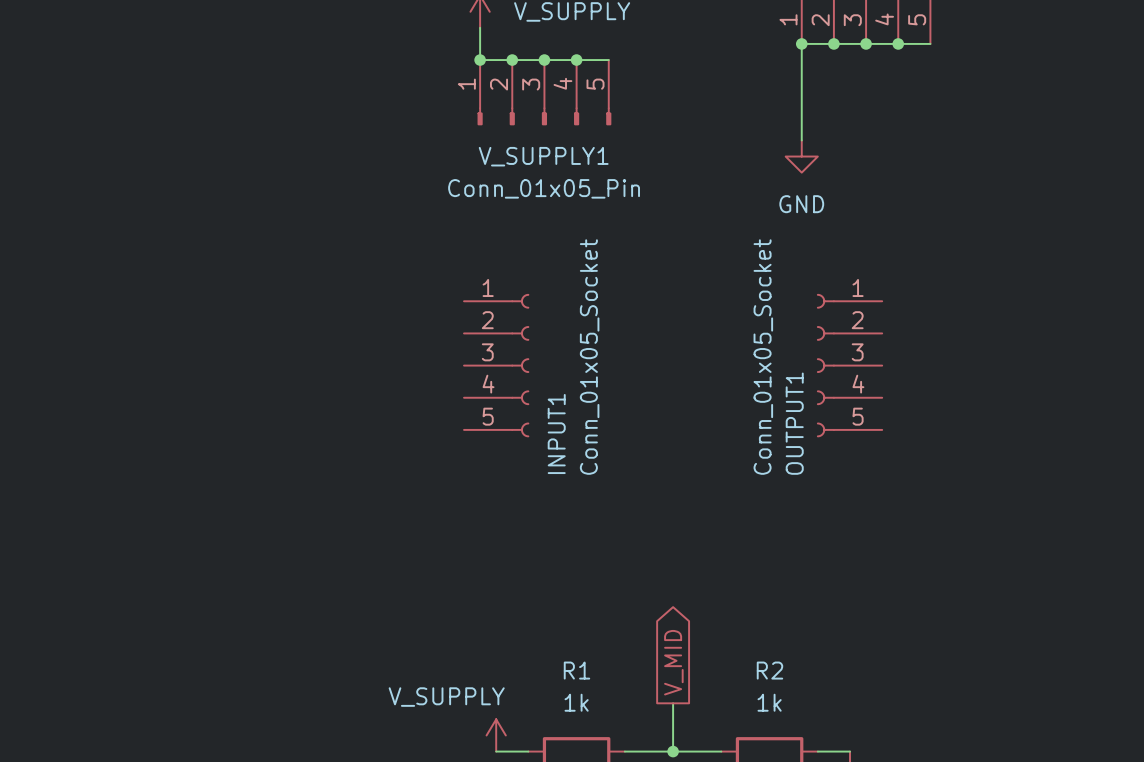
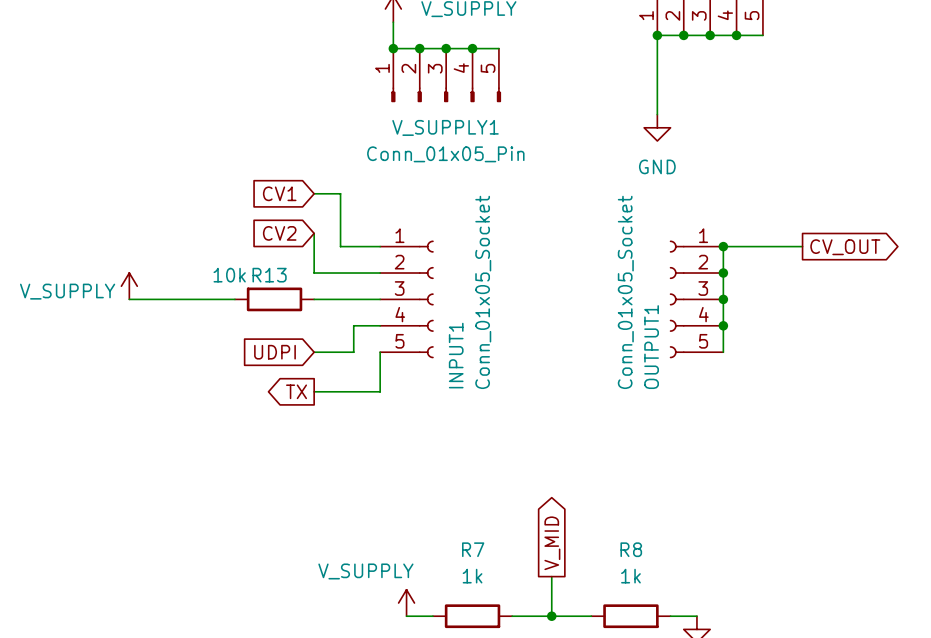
global label: none -> CV1 (279, 193)
wire: none -> (314, 193) (340, 193) (340, 246) (380, 246)
global label: none -> CV2 (279, 233)
wire: none -> (314, 233) (314, 273) (380, 273)
junction: none -> (723, 246)
wire: none -> (802, 246) (723, 246) (723, 352)
global label: none -> CV_OUT (845, 247)
junction: none -> (723, 273)
power symbol: none -> V_SUPPLY (129, 286)
wire: none -> (129, 299) (234, 299)
R13: none -> 10k (274, 299)
wire: none -> (314, 299) (380, 299)
junction: none -> (723, 299)
wire: none -> (380, 325) (353, 325) (353, 352) (314, 352)
junction: none -> (723, 325)
global label: none -> UDPI (274, 352)
wire: none -> (380, 352) (380, 391) (314, 391)
global label: none -> TX (296, 391)
R1 name: R1 (576, 670) -> R7 (473, 549)
R2 name: R2 (769, 670) -> R8 (631, 549)

